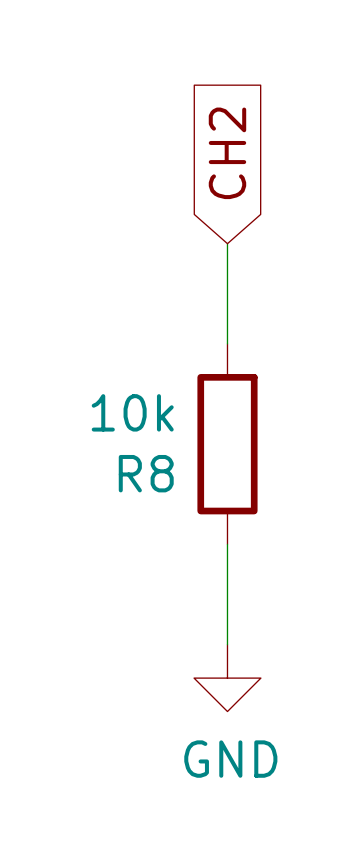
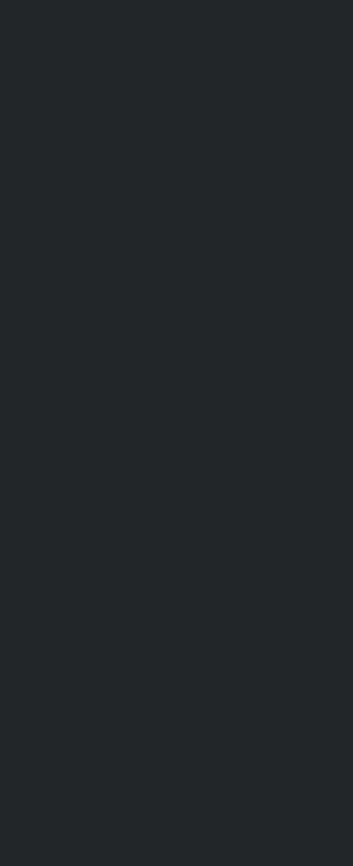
global label: CH2 (227, 153) -> none
wire: (227, 243) (227, 343) -> none
R8: 10k (227, 444) -> none
wire: (227, 544) (227, 644) -> none
power symbol: GND (227, 678) -> none

